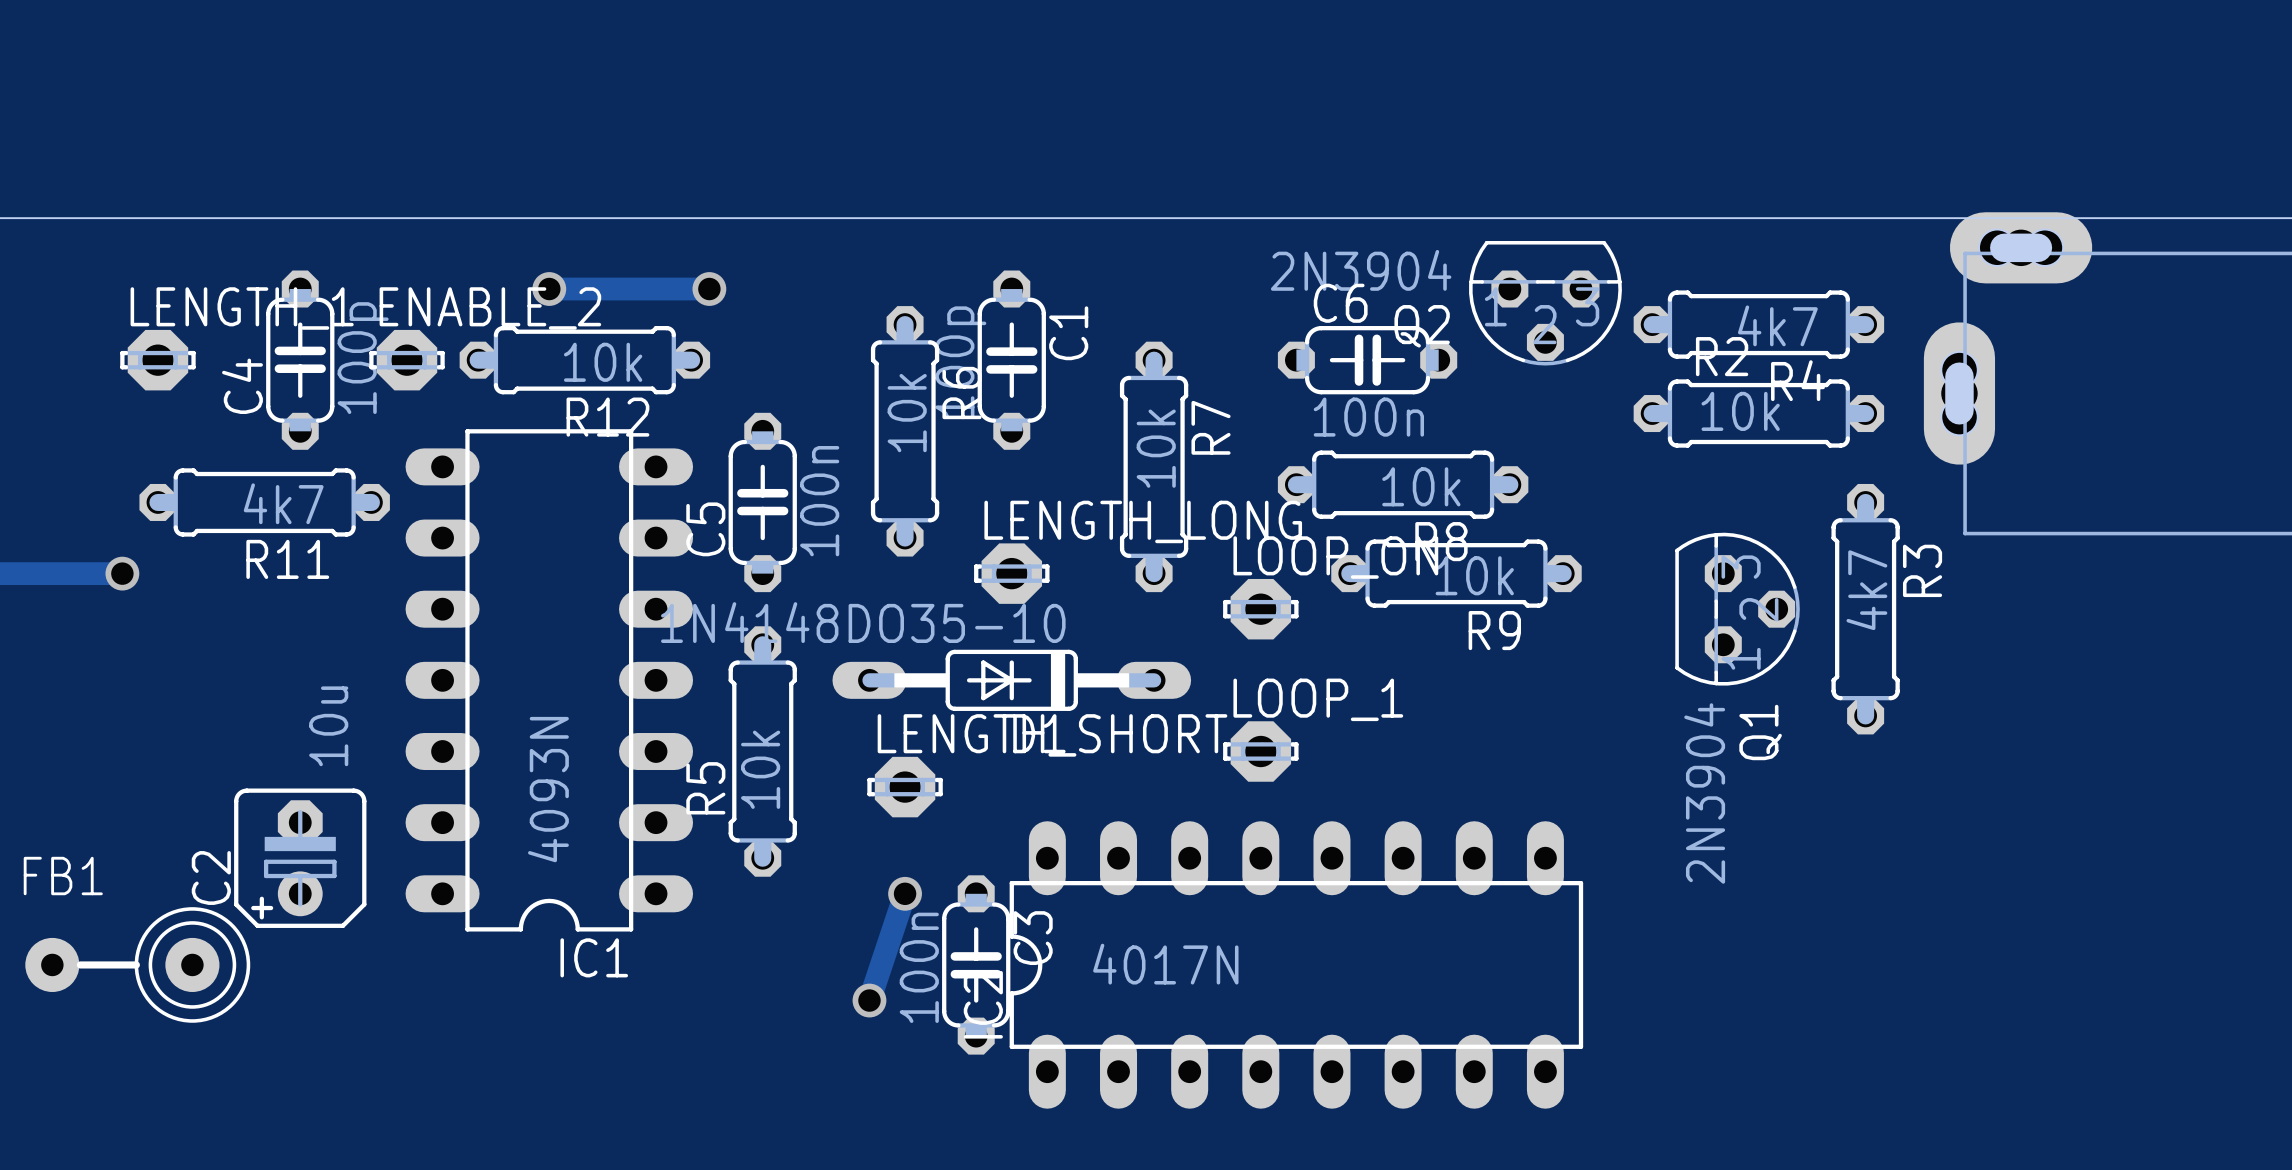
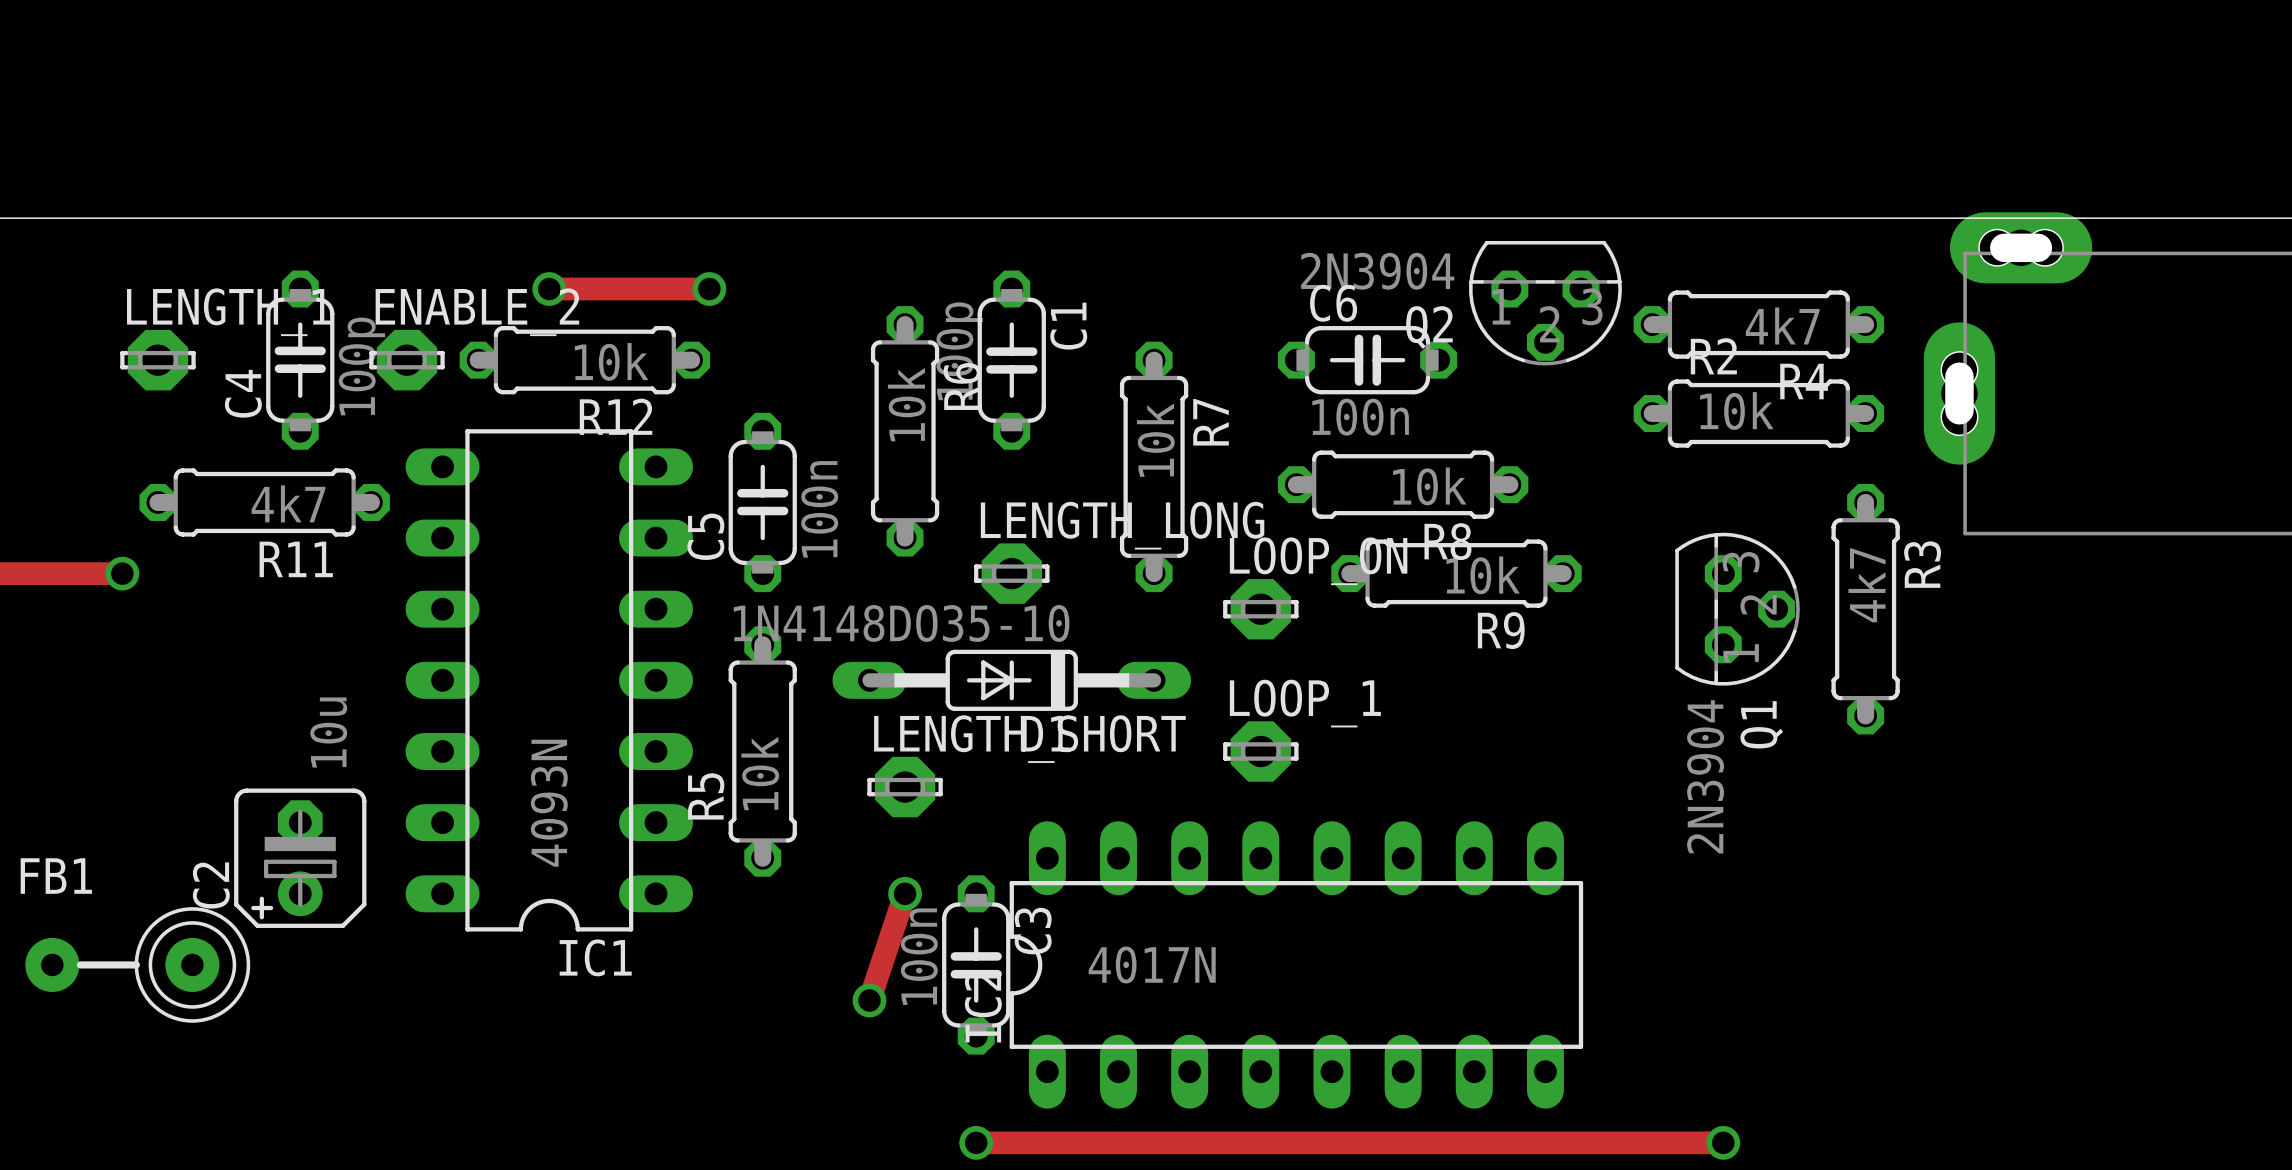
track: none -> (976, 1142) (1723, 1142)
via: none -> (976, 1142)
via: none -> (1723, 1142)

